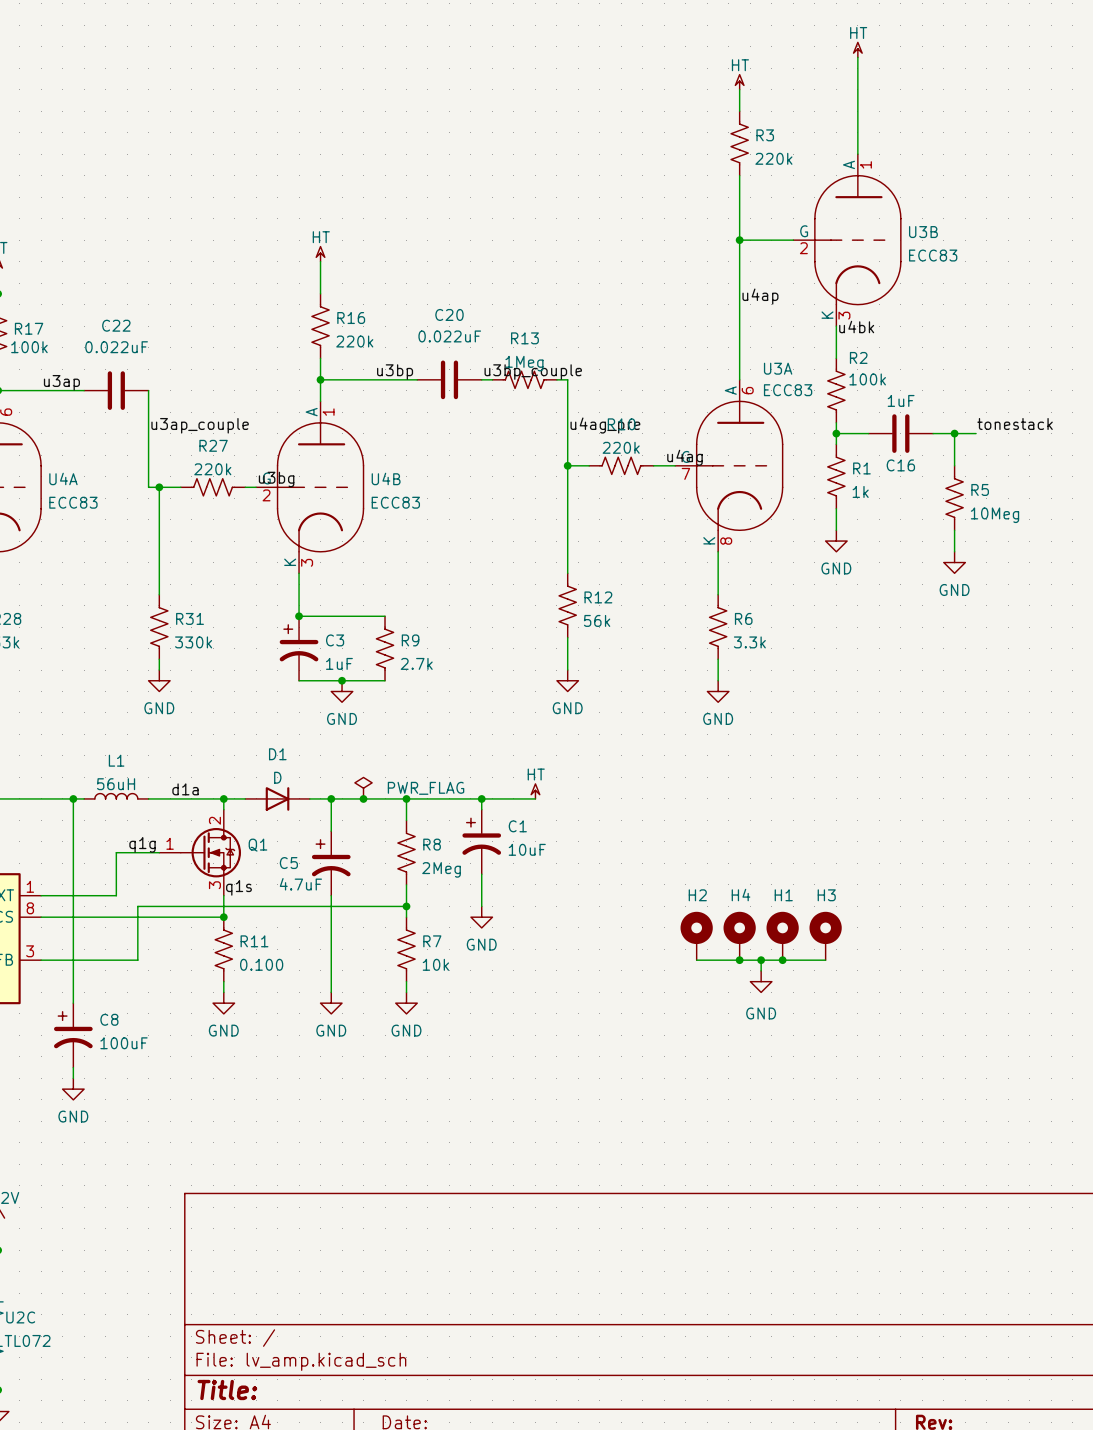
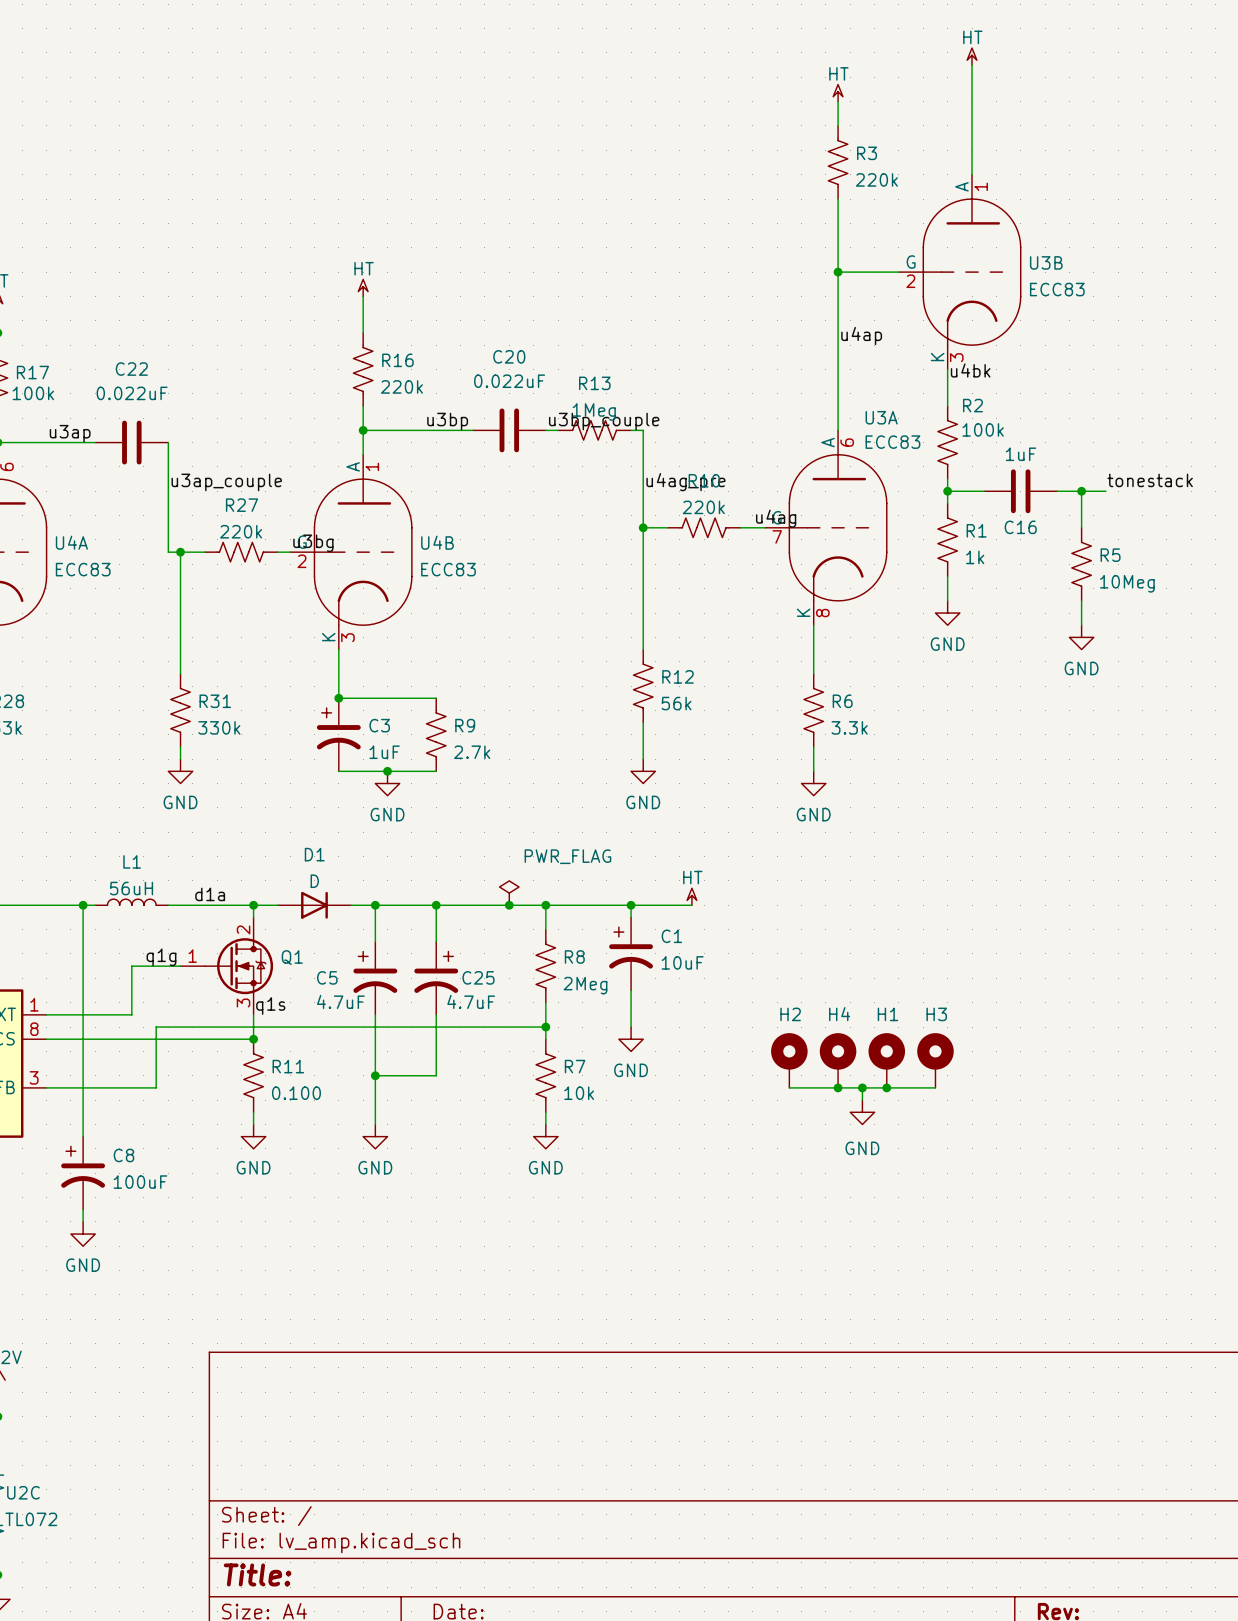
power symbol position: PWR_FLAG (363, 788) -> PWR_FLAG (509, 893)
power symbol text position: PWR_FLAG (426, 788) -> PWR_FLAG (567, 856)
power symbol position: HT (535, 791) -> HT (691, 896)
junction: (363, 798) -> none
junction: none -> (436, 905)
wire: (406, 798) (406, 820) -> none
junction: (406, 798) -> none
junction: none -> (509, 905)
wire: none -> (606, 905) (691, 905)
wire: none -> (631, 905) (631, 917)
junction: none -> (631, 905)
C1 position: (481, 841) -> (631, 953)
R8 position: (406, 852) -> (545, 966)
C25: none -> 4.7uF (436, 978)
wire: none -> (631, 990) (631, 1027)
wire: (406, 884) (406, 917) -> (436, 905) (436, 941)
wire: none -> (436, 1014) (436, 1075) (375, 1075)
wire: none -> (460, 1027) (545, 1027) (545, 1039)
junction: (406, 906) -> none
junction: none -> (545, 1027)
power symbol: GND (481, 917) -> none
power symbol: none -> GND (631, 1039)
junction: none -> (375, 1075)
R7 position: (406, 949) -> (545, 1075)
wire: (406, 981) (406, 992) -> (545, 1112) (545, 1124)
power symbol: GND (406, 1003) -> none
power symbol: none -> GND (545, 1136)

